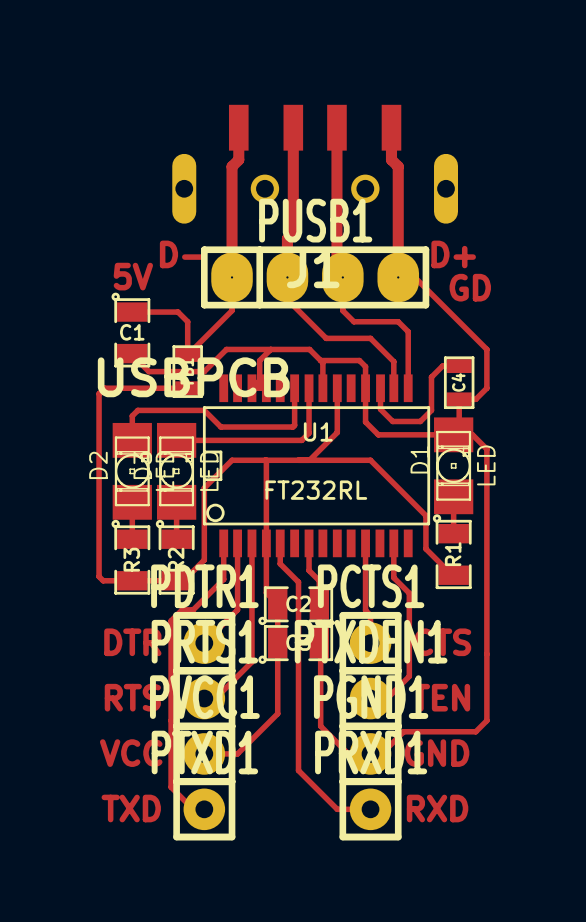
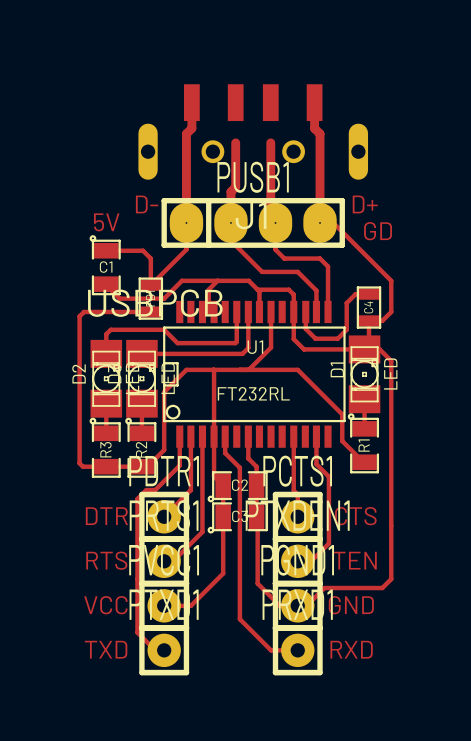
track: (293, 127) (293, 177) -> none
track: (336, 127) (336, 177) -> none

